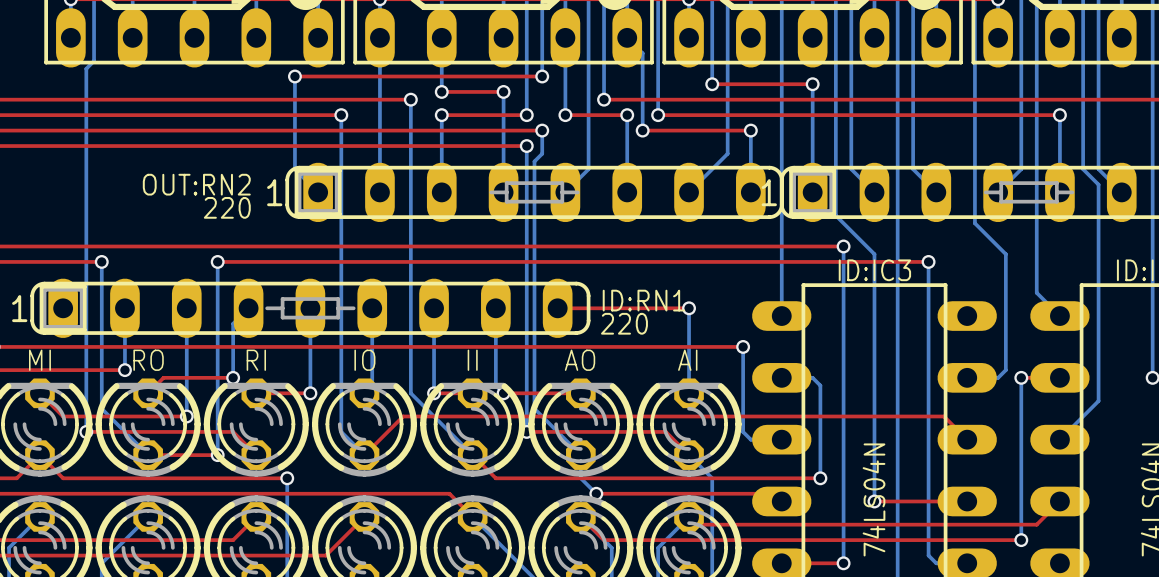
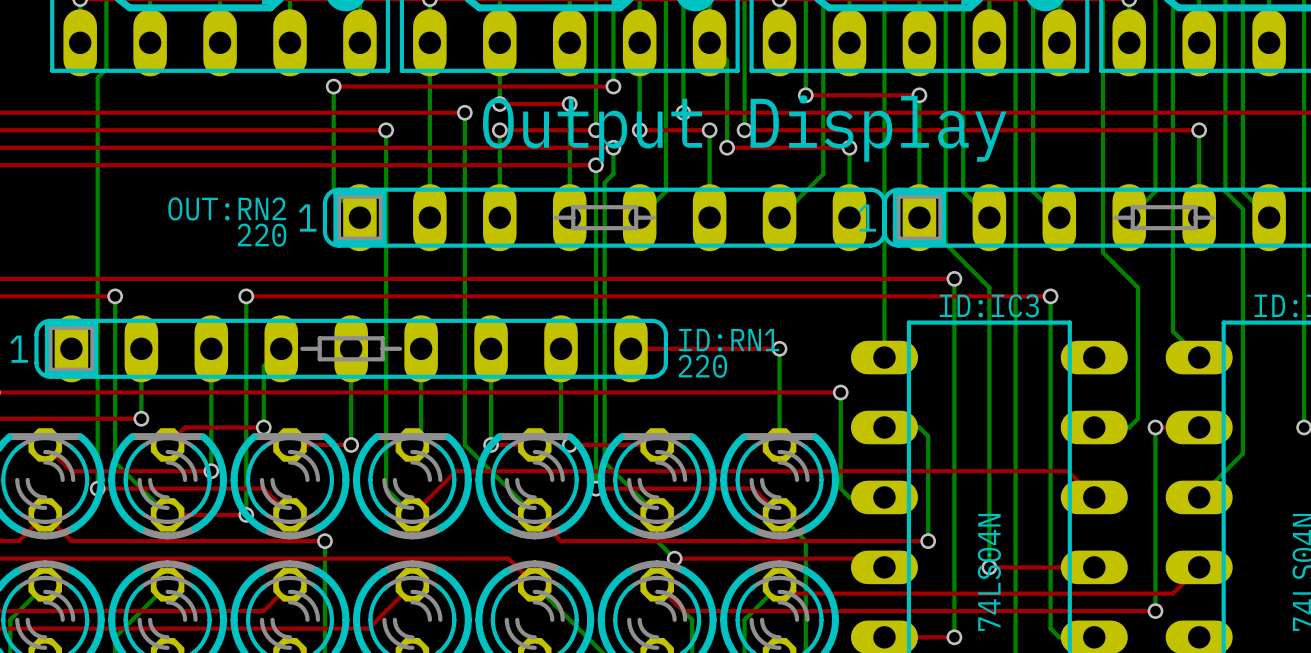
text: none -> Output Display (744, 128)
text: MI (39, 360) -> none
text: RO (148, 360) -> none
text: RI (256, 360) -> none
text: IO (364, 360) -> none
text: II (472, 360) -> none
text: AO (580, 360) -> none
text: AI (687, 360) -> none

